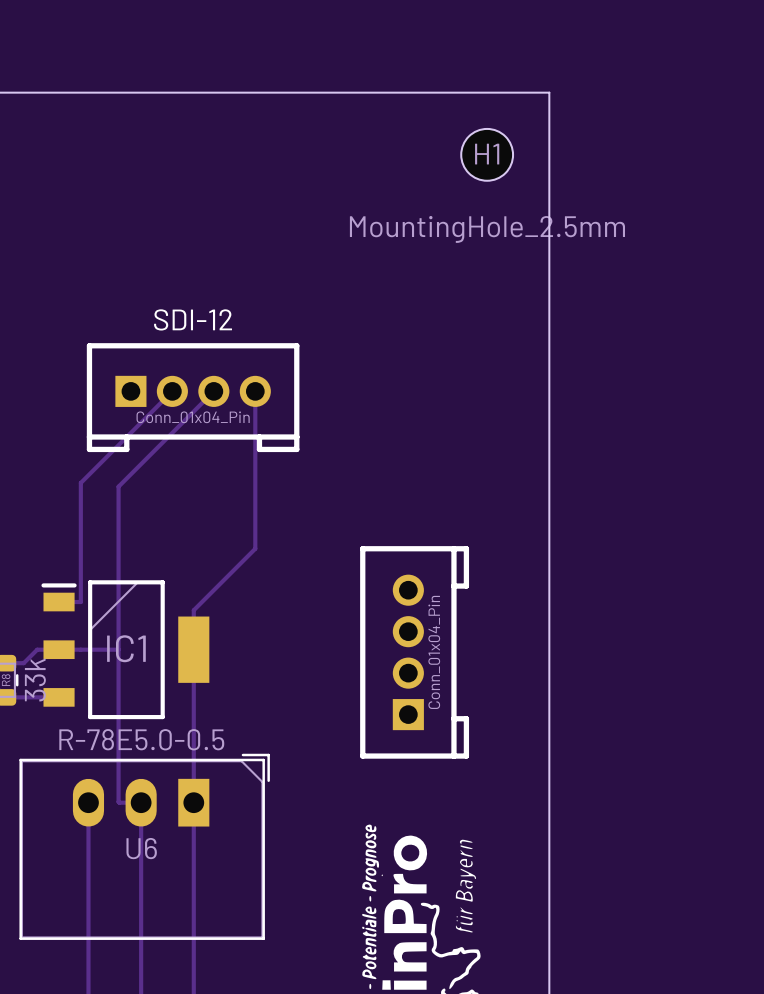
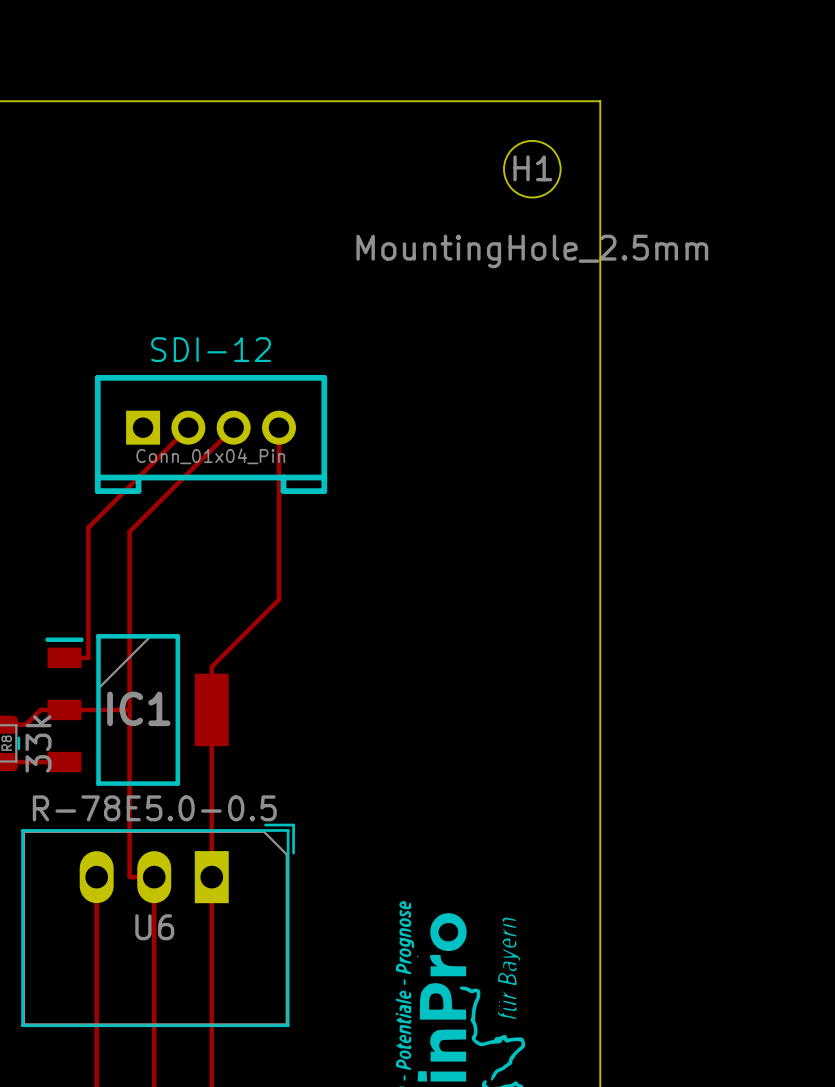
part: Conn_01x04_Pin (414, 652) -> none

